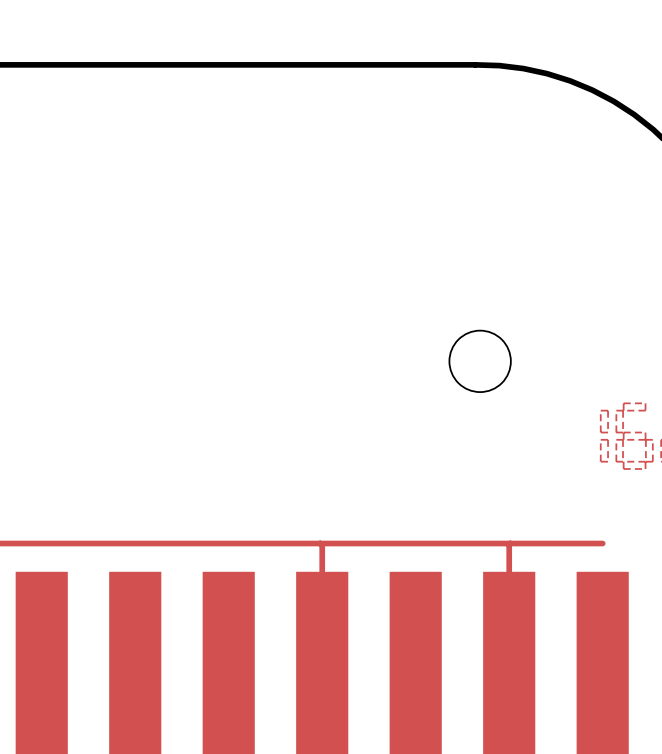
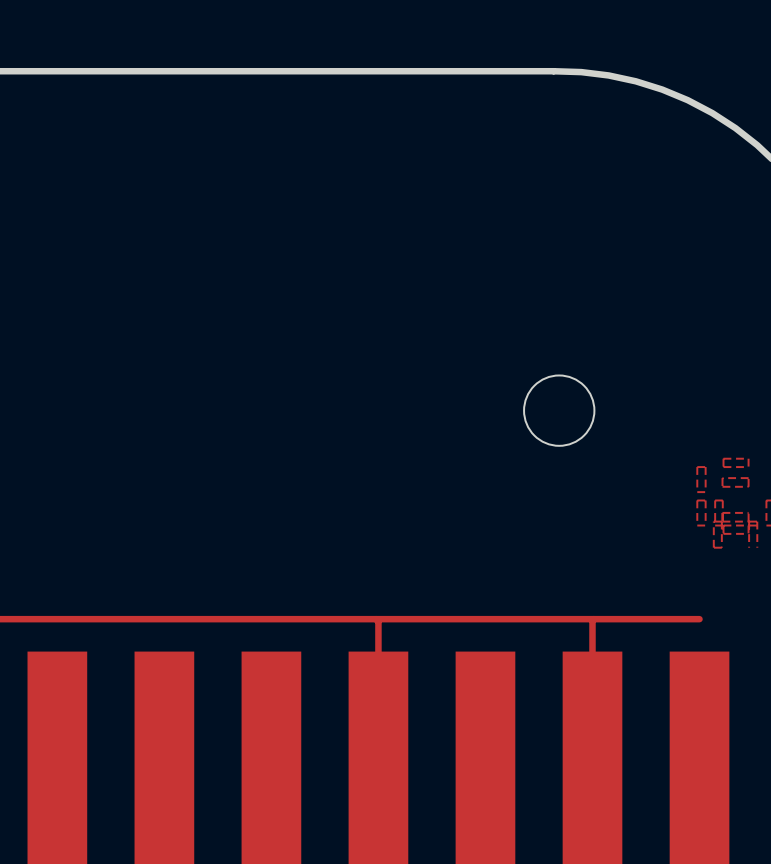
zone outline: (616, 410) (623, 410) (623, 432) (616, 432) (616, 410) -> none
zone outline: none -> (722, 478) (722, 486) (748, 486) (748, 478) (722, 478)
zone outline: (645, 439) (645, 432) (623, 432) (623, 439) (652, 439) (653, 458) -> (749, 521) (757, 521)
zone outline: none -> (722, 512) (722, 521) (748, 521) (748, 512) (722, 512)
zone outline: none -> (713, 521) (713, 547) (721, 547) (721, 521) (713, 521)

